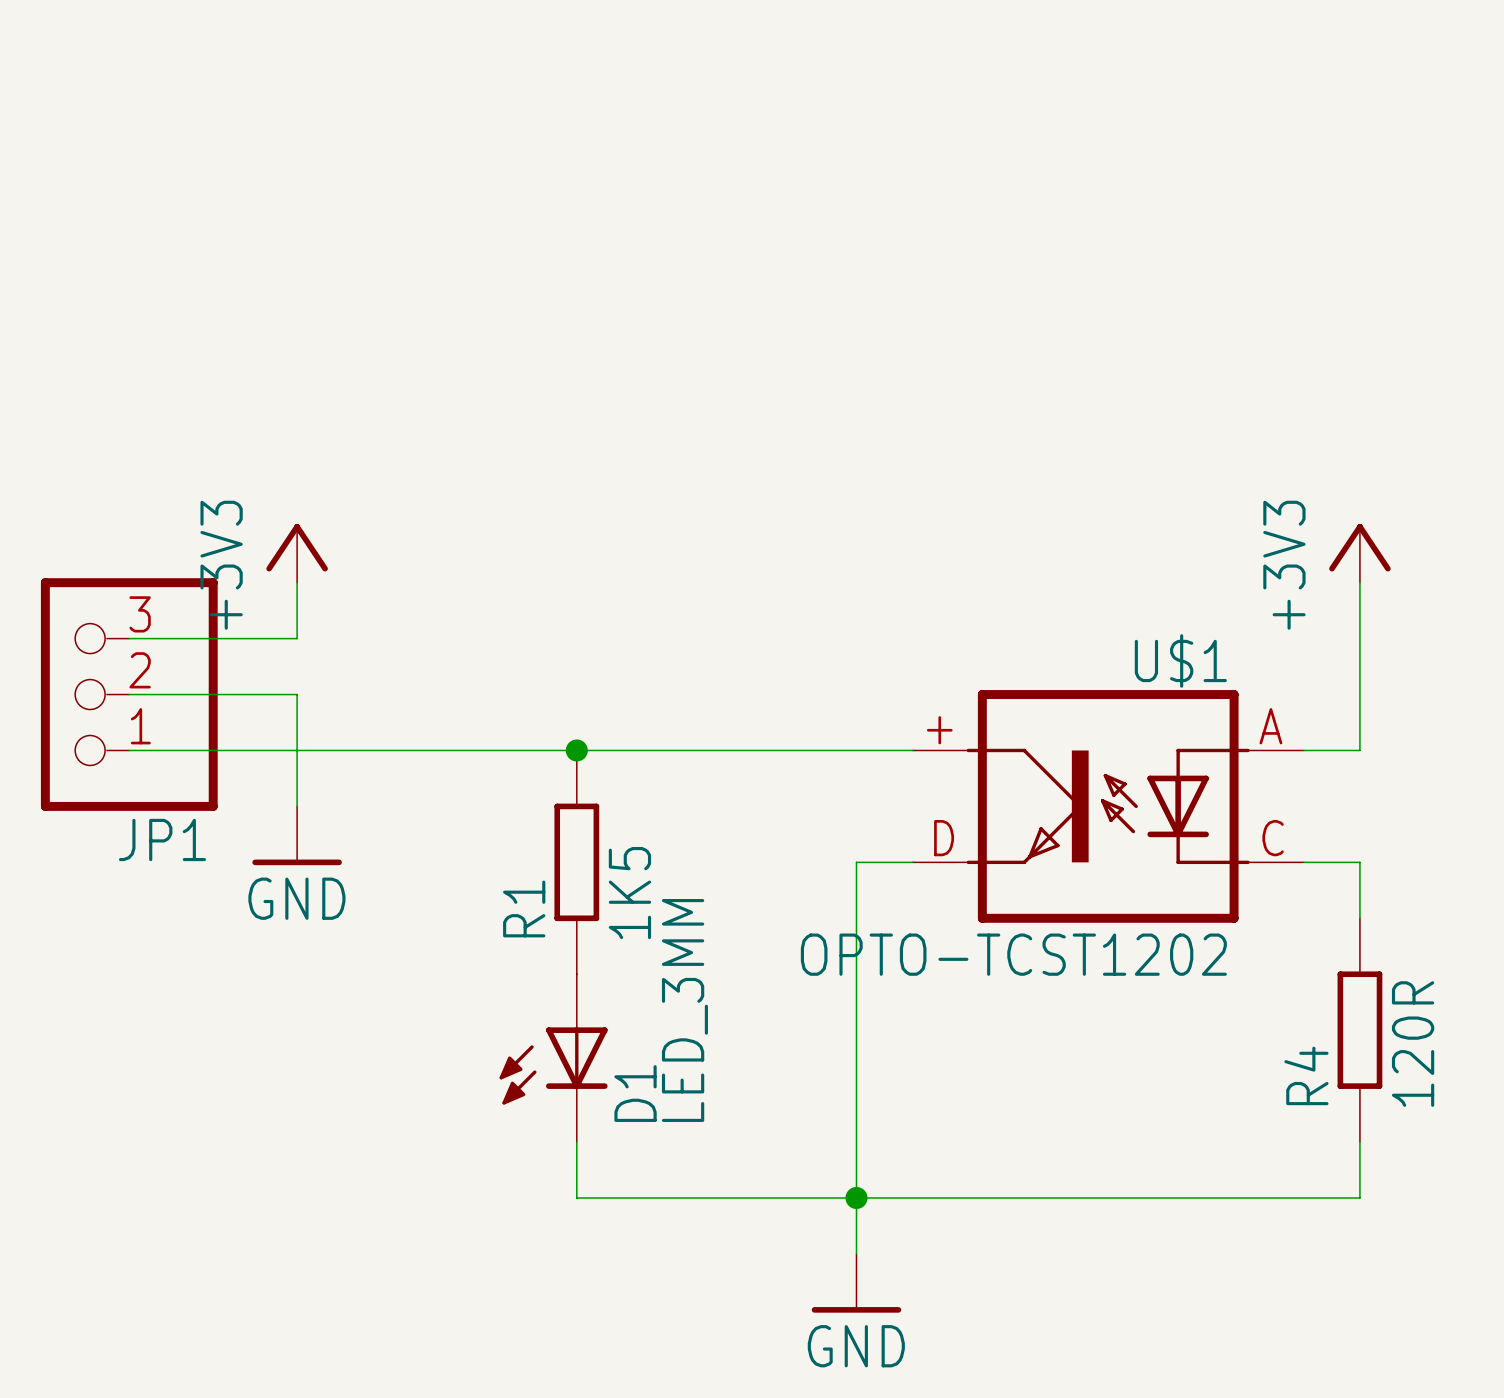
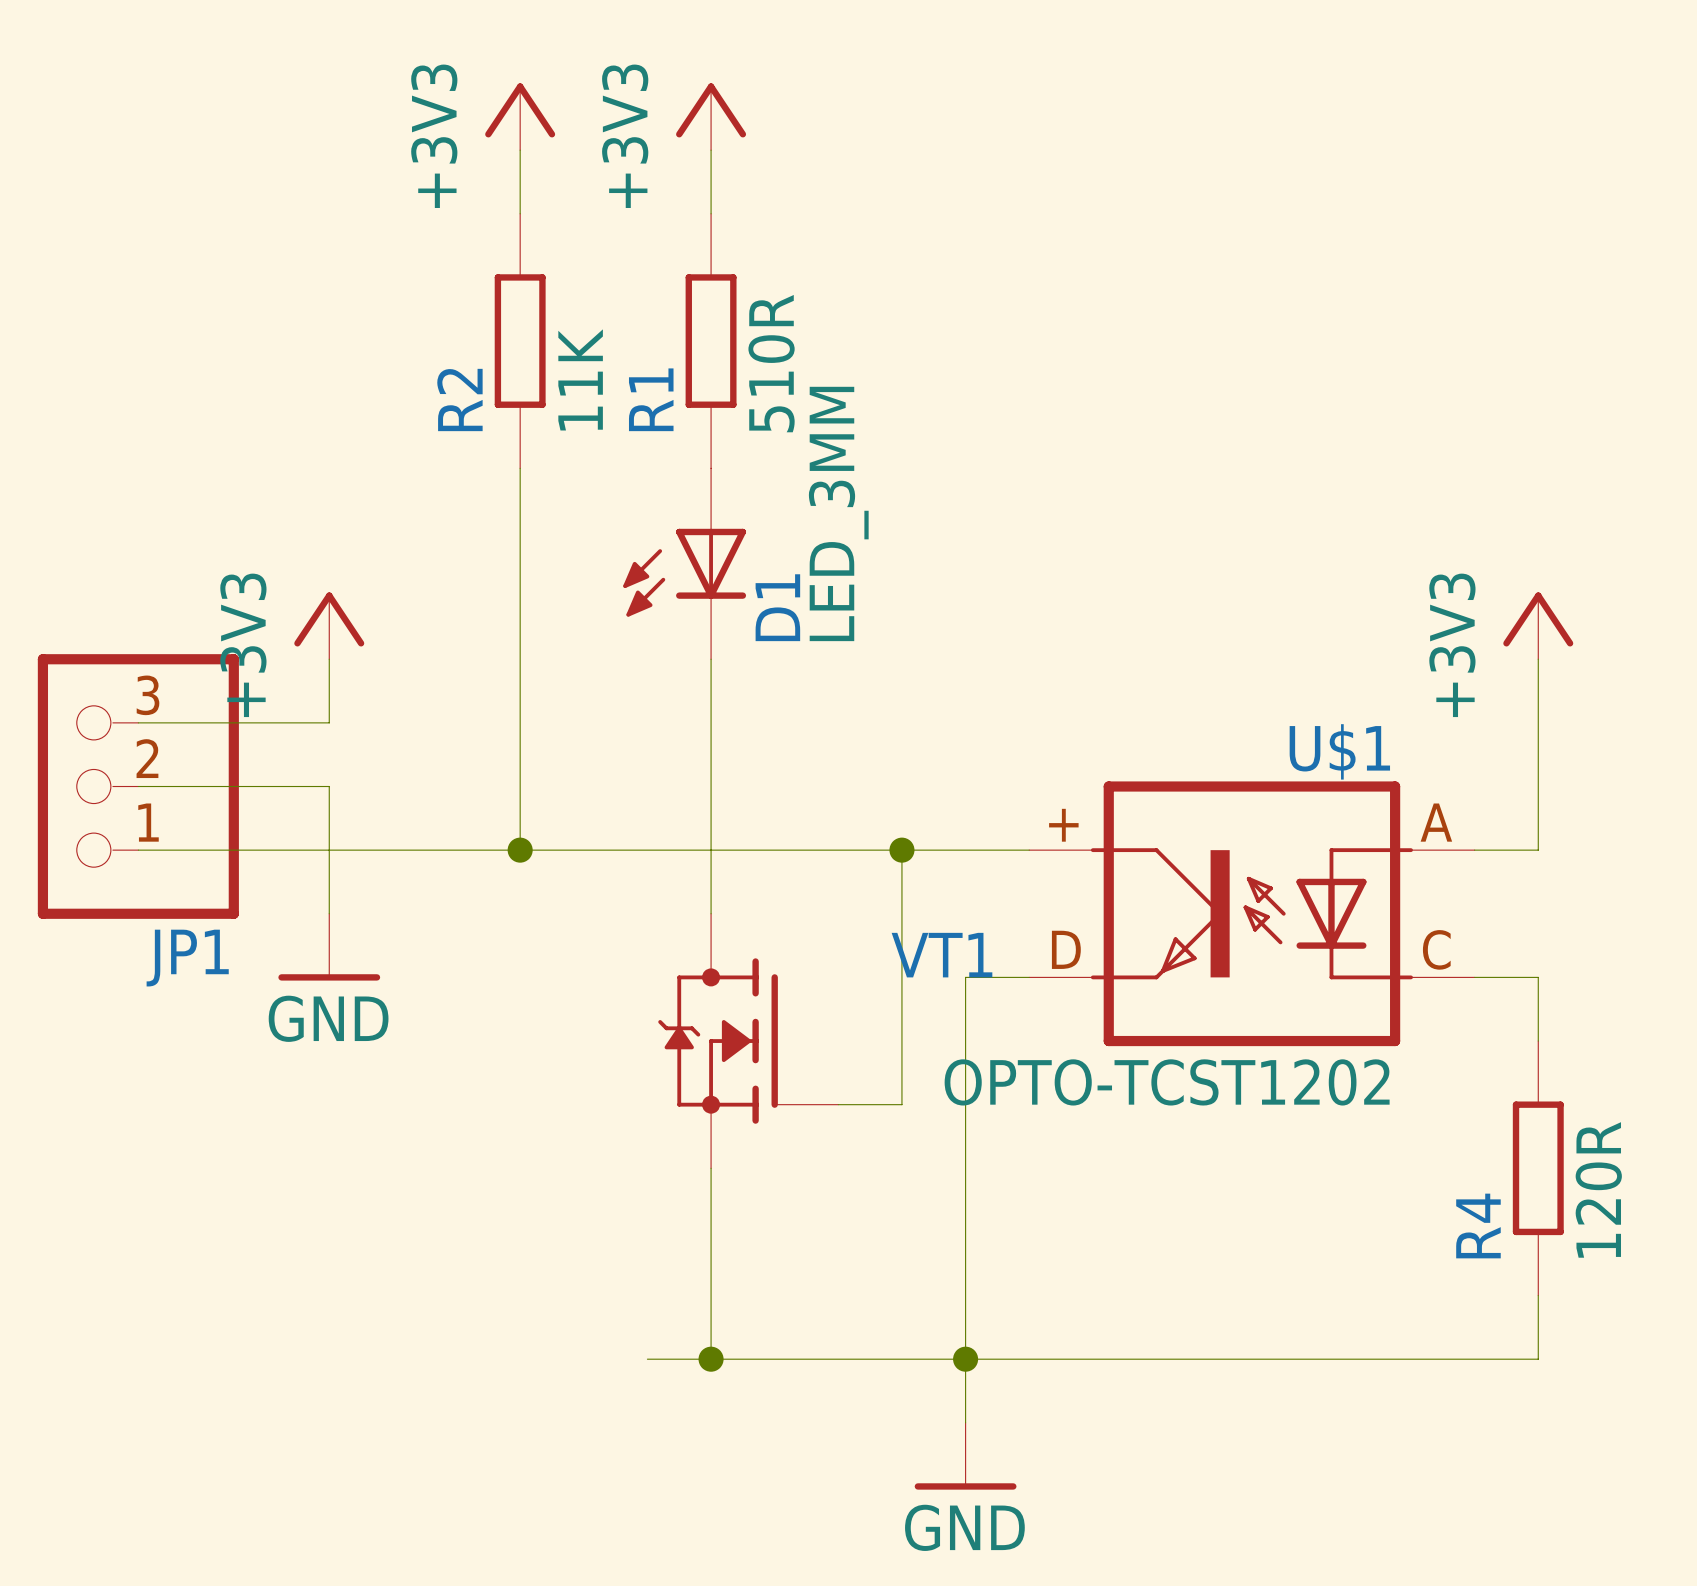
power symbol: none -> +3V3 (520, 116)
power symbol: none -> +3V3 (711, 116)
wire: none -> (520, 150) (520, 213)
wire: none -> (711, 150) (711, 213)
R2: none -> 11K (520, 341)
wire: none -> (520, 468) (520, 850)
wire: none -> (711, 659) (711, 913)
junction: none -> (520, 850)
junction: (576, 750) -> none
wire: none -> (901, 850) (901, 1104) (838, 1104)
junction: none -> (901, 850)
R1 position: (576, 862) -> (711, 341)
R1 value: 1K5 (629, 893) -> 510R (771, 363)
VT1: none -> (748, 1041)
wire: none -> (711, 1168) (711, 1359)
D1 position: (553, 1058) -> (684, 563)
wire: (576, 1142) (576, 1197) -> none
junction: none -> (711, 1359)

